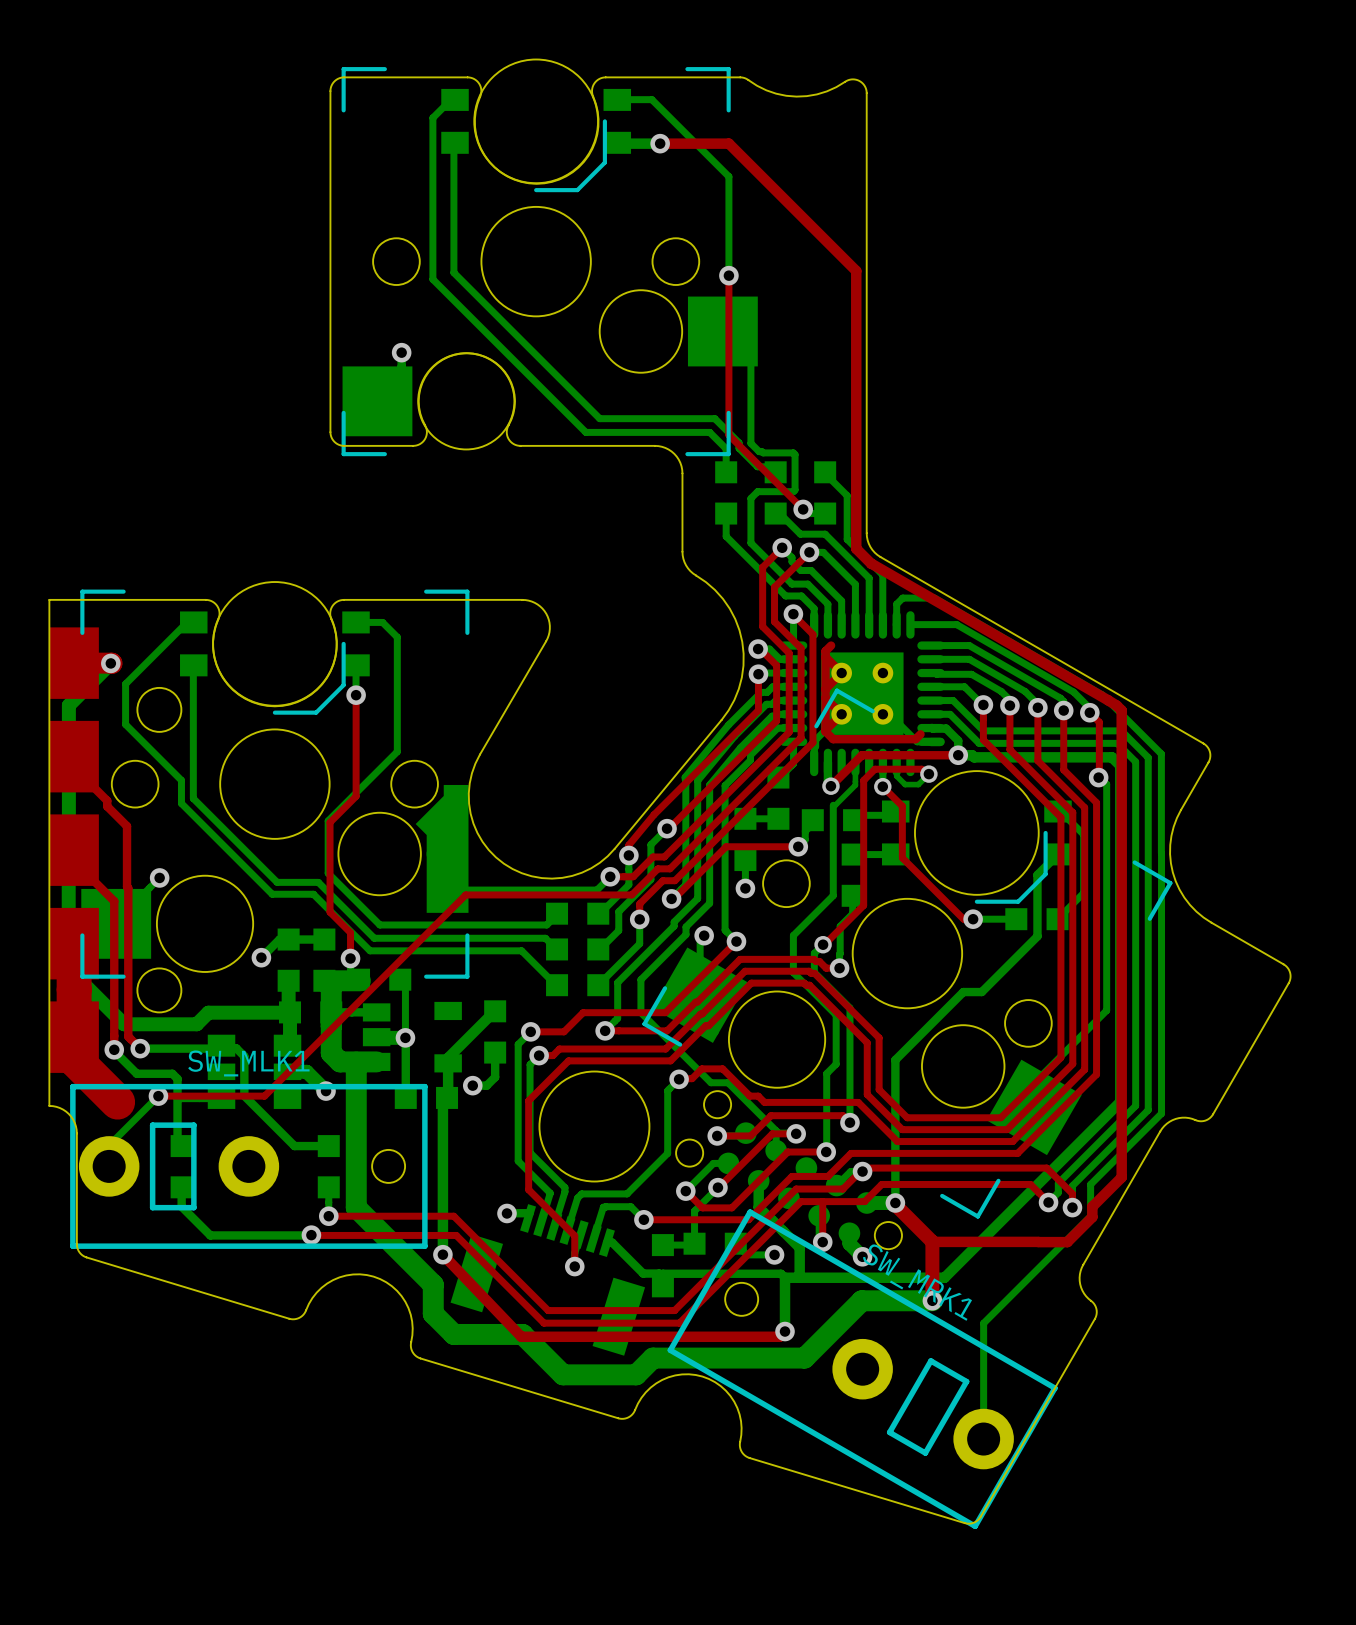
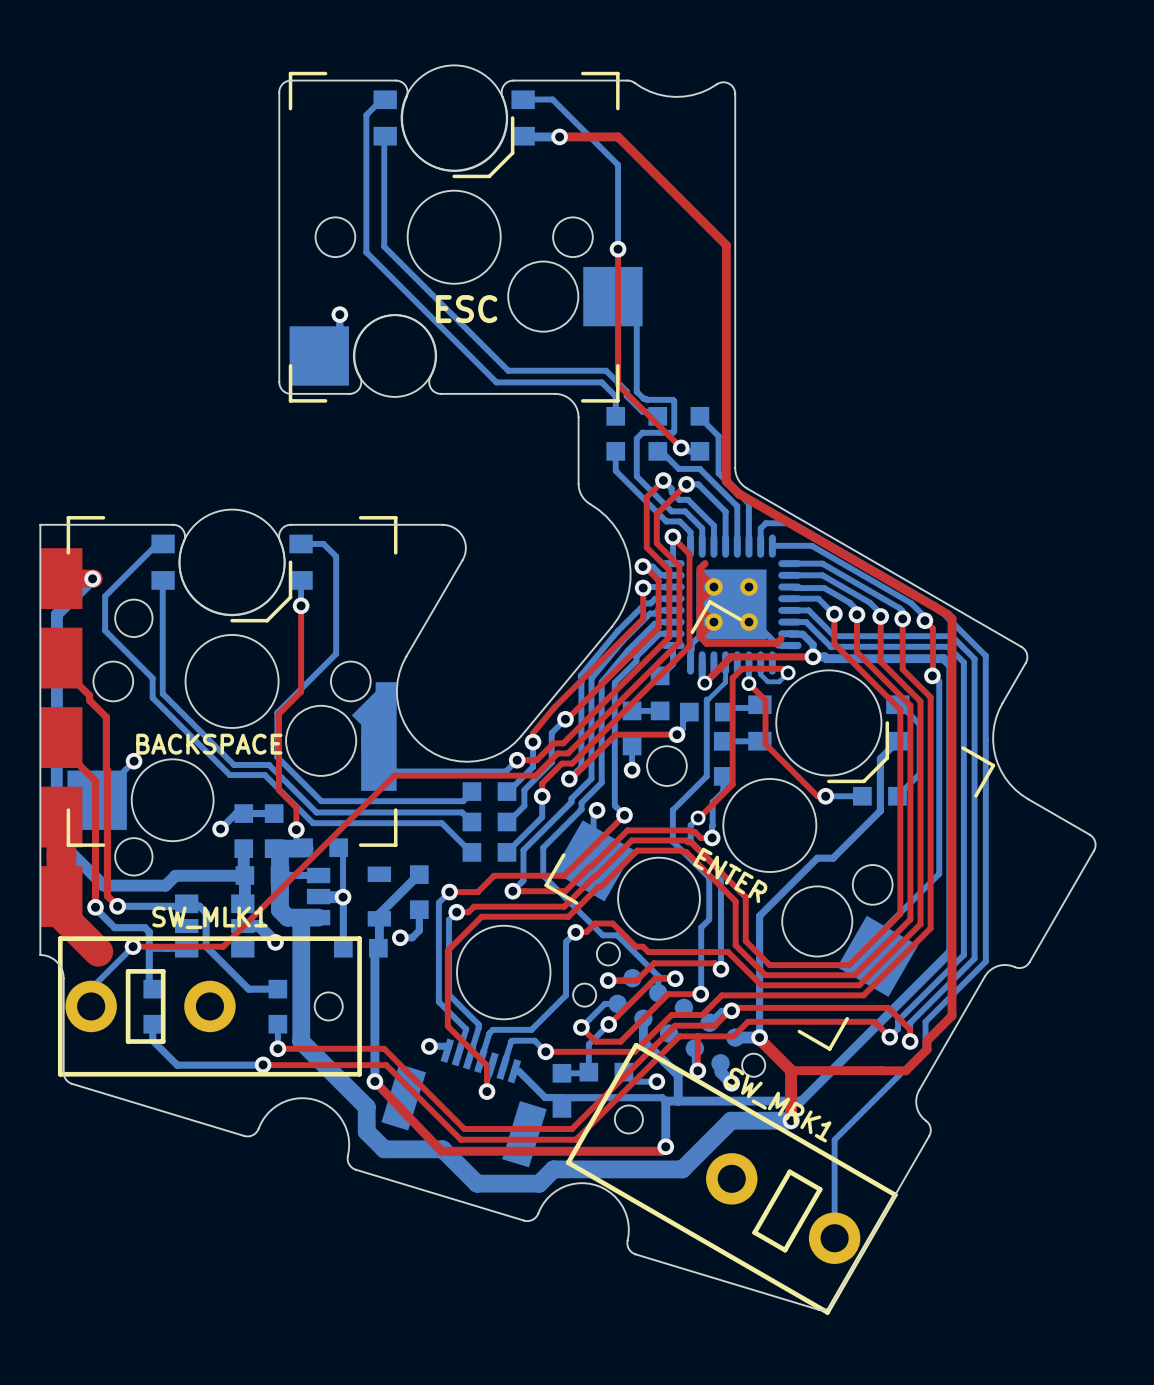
text: none -> ESC (466, 309)
text: none -> BACKSPACE (209, 744)
text: none -> ENTER (730, 875)

